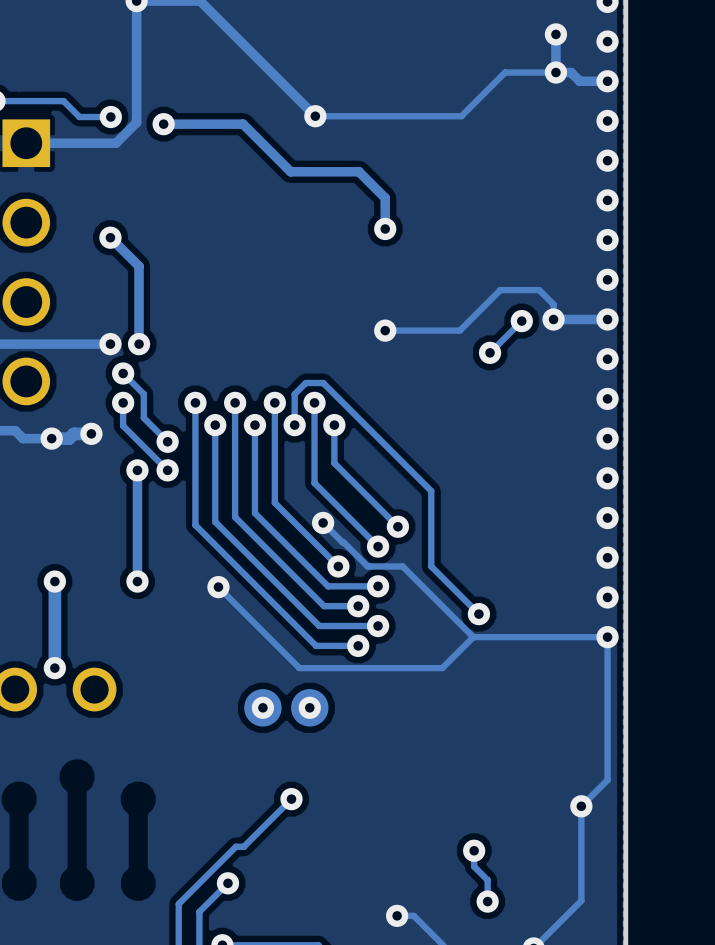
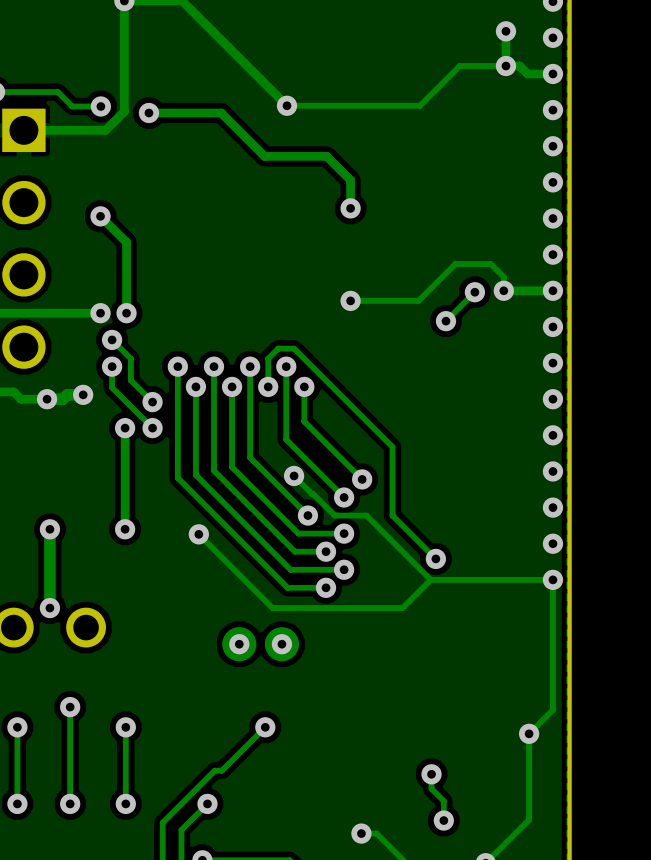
track: none -> (70, 707) (70, 803)
via: none -> (70, 707)
track: none -> (17, 727) (17, 803)
via: none -> (17, 727)
track: none -> (125, 727) (125, 803)
via: none -> (125, 727)
via: none -> (17, 803)
via: none -> (70, 803)
via: none -> (125, 803)

